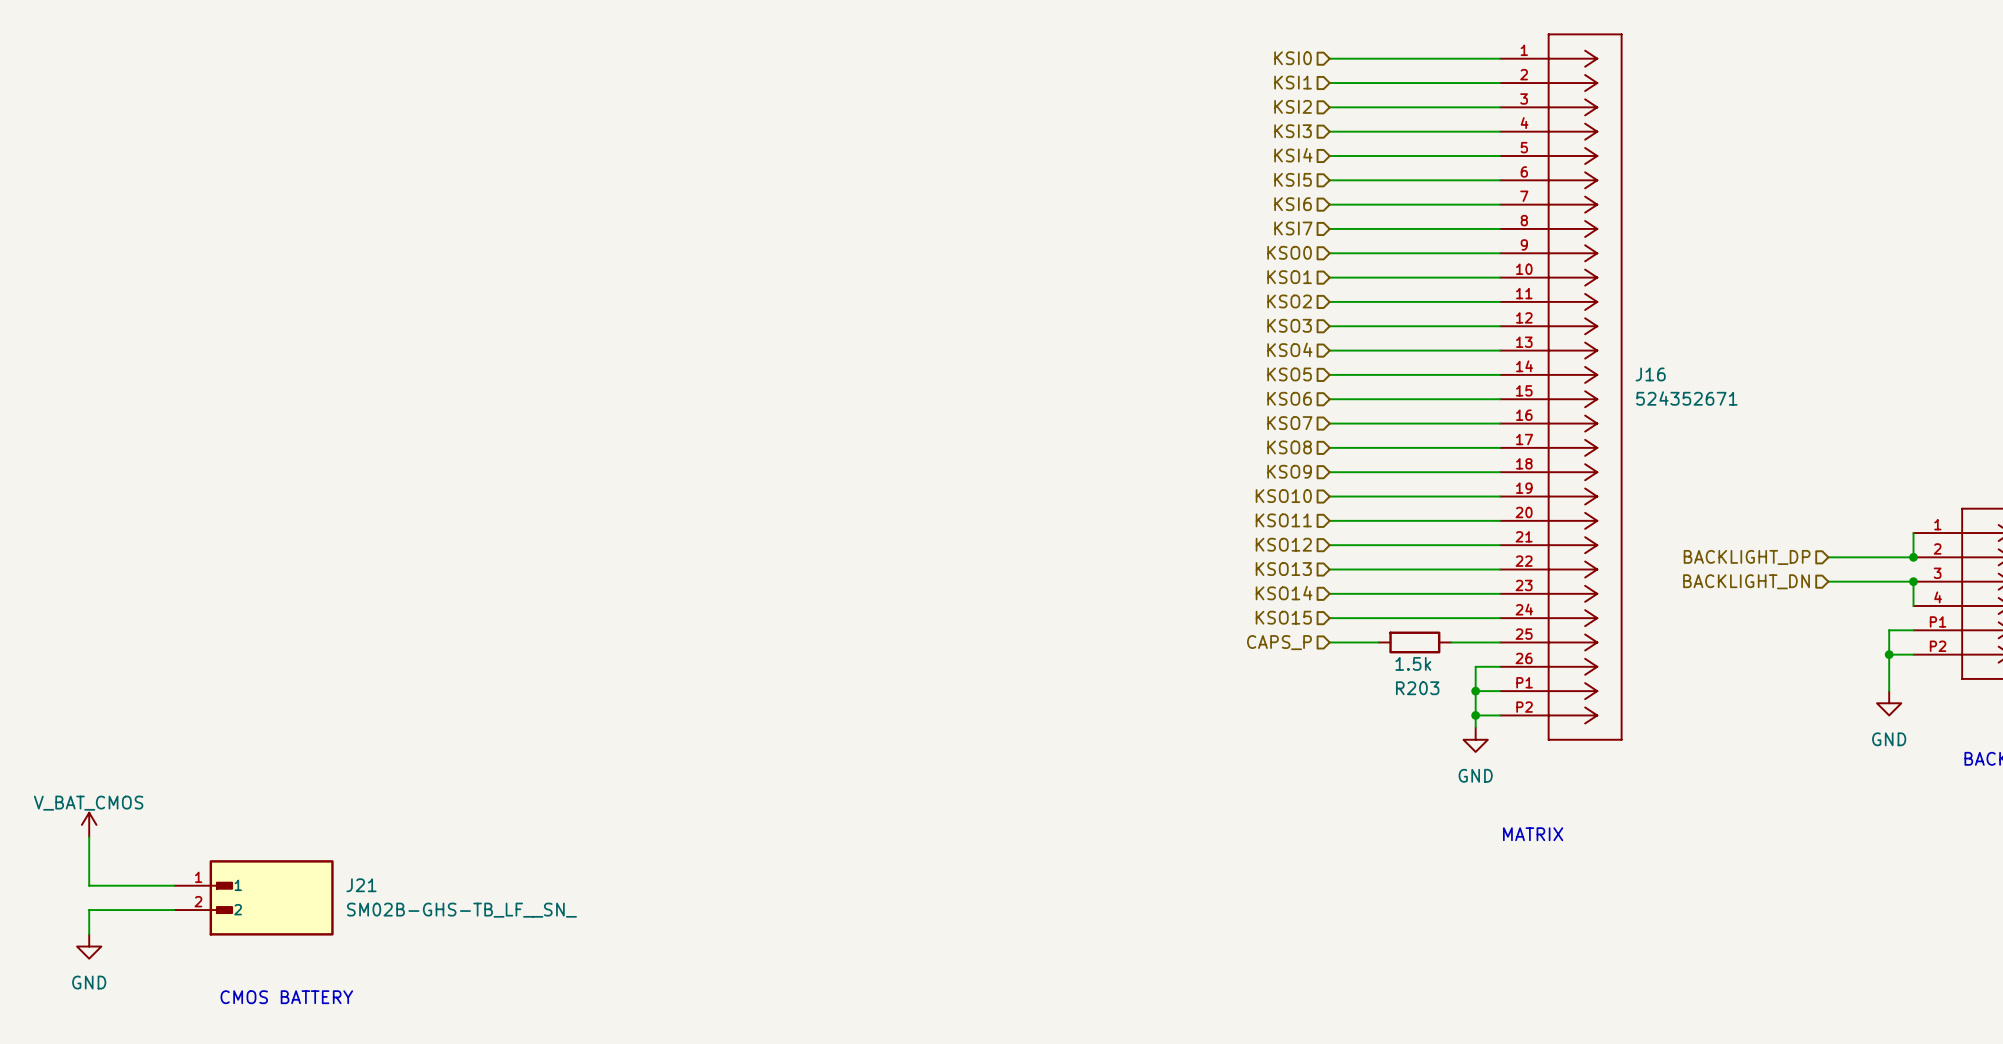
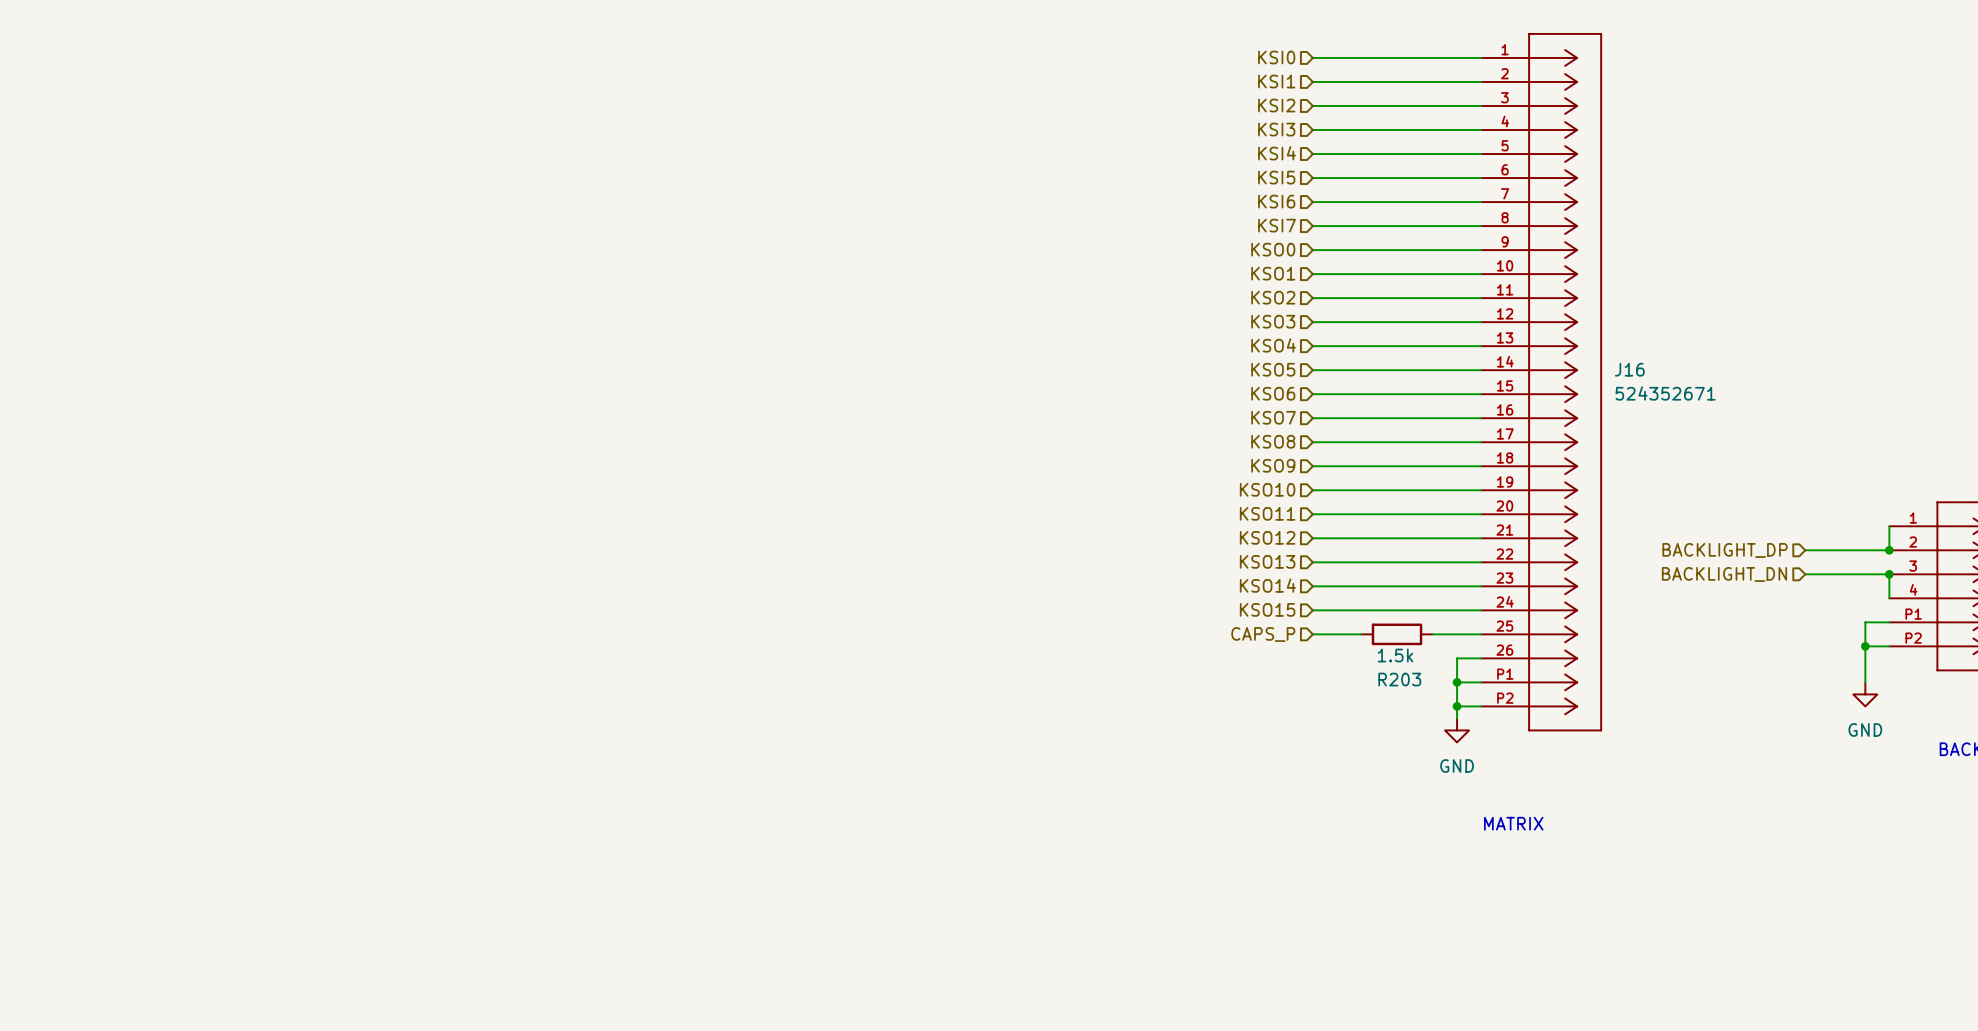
power symbol: V_BAT_CMOS (89, 824) -> none
wire: (89, 837) (89, 885) (174, 885) -> none
J21: SM02B-GHS-TB_LF__SN_ (253, 897) -> none
wire: (174, 910) (89, 910) (89, 934) -> none
power symbol: GND (89, 946) -> none
text: CMOS BATTERY (286, 997) -> none

